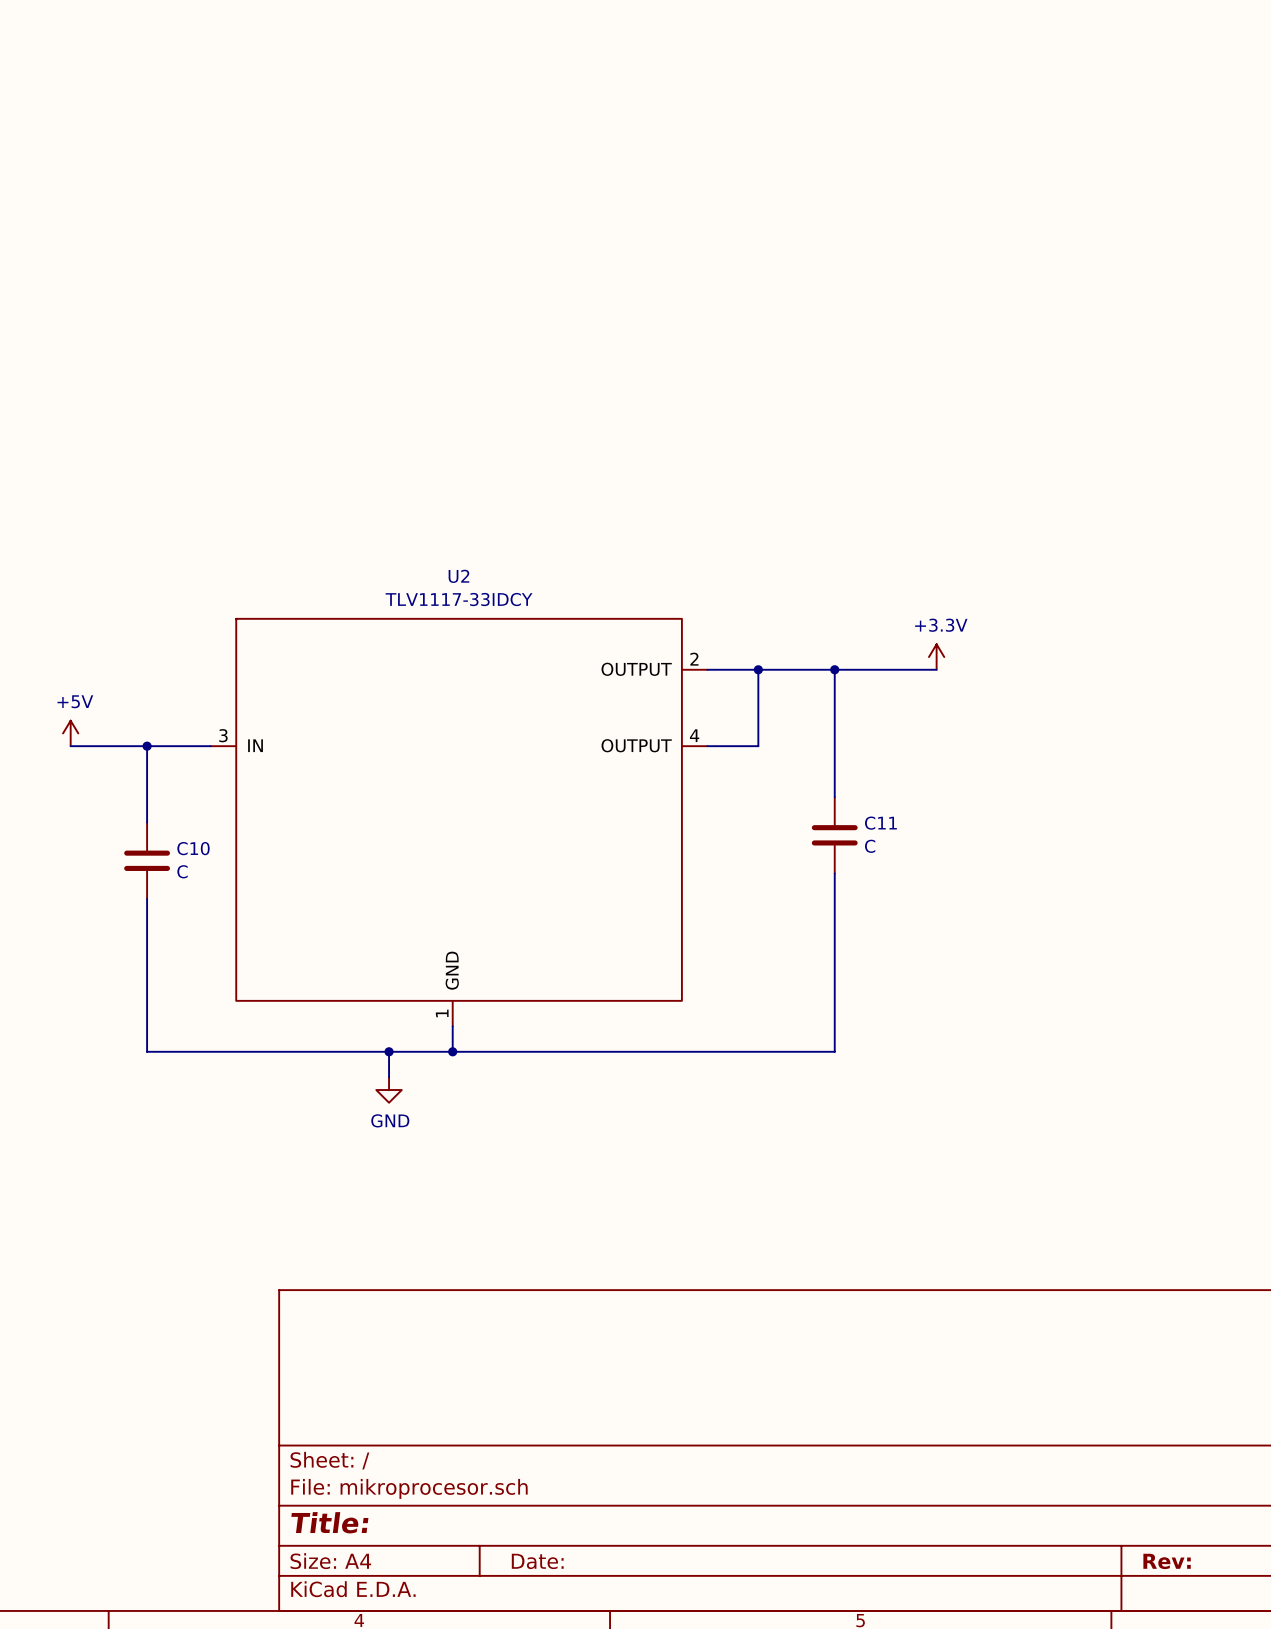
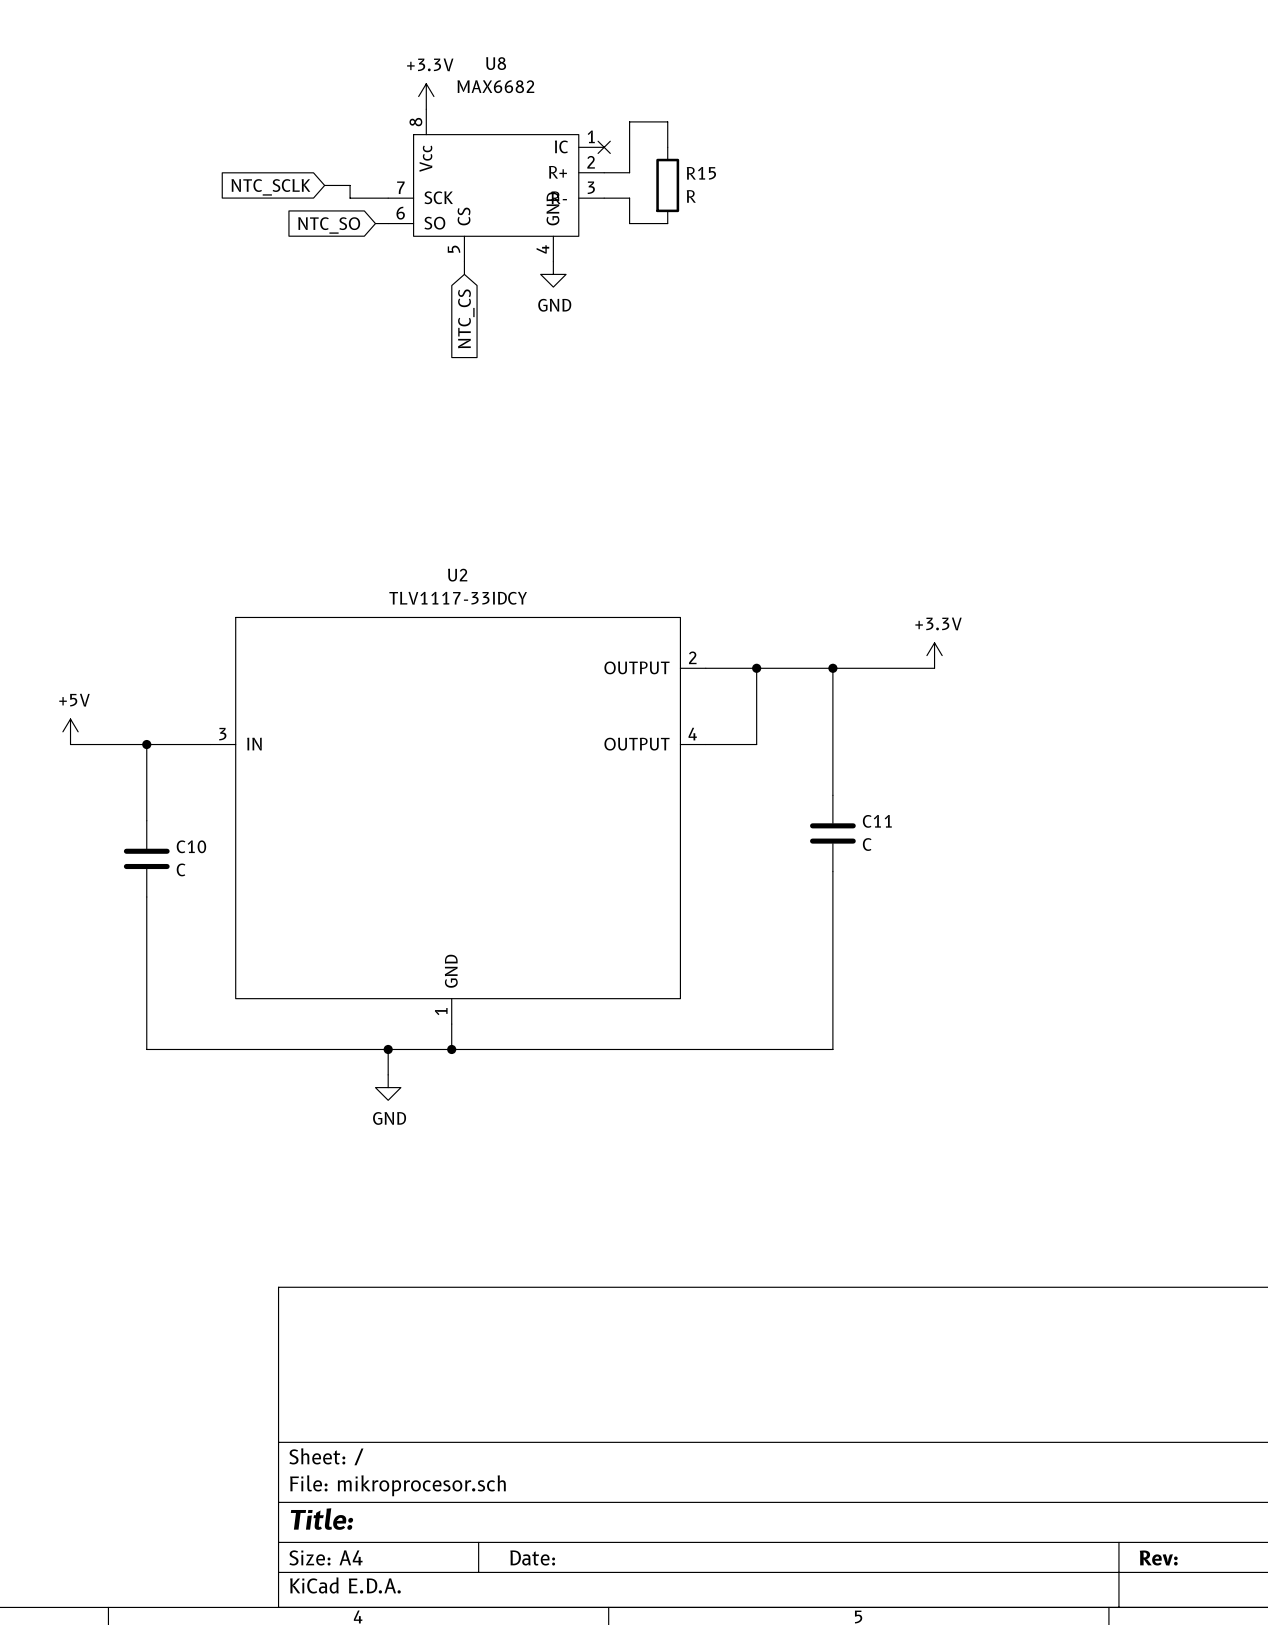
power symbol: none -> +3.3V (426, 96)
no-connect mark: none -> (604, 147)
wire: none -> (667, 147) (667, 121) (629, 121) (629, 172) (604, 172)
wire: none -> (324, 185) (350, 185) (350, 198) (388, 198)
U8: none -> MAX6682 (496, 185)
R15: none -> R (667, 185)
global label: none -> NTC_SCLK (270, 187)
wire: none -> (604, 198) (629, 198) (629, 223) (667, 223)
wire: none -> (375, 223) (388, 223)
global label: none -> NTC_SO (329, 225)
wire: none -> (464, 261) (464, 274)
power symbol: none -> GND (553, 274)
global label: none -> NTC_CS (466, 318)

